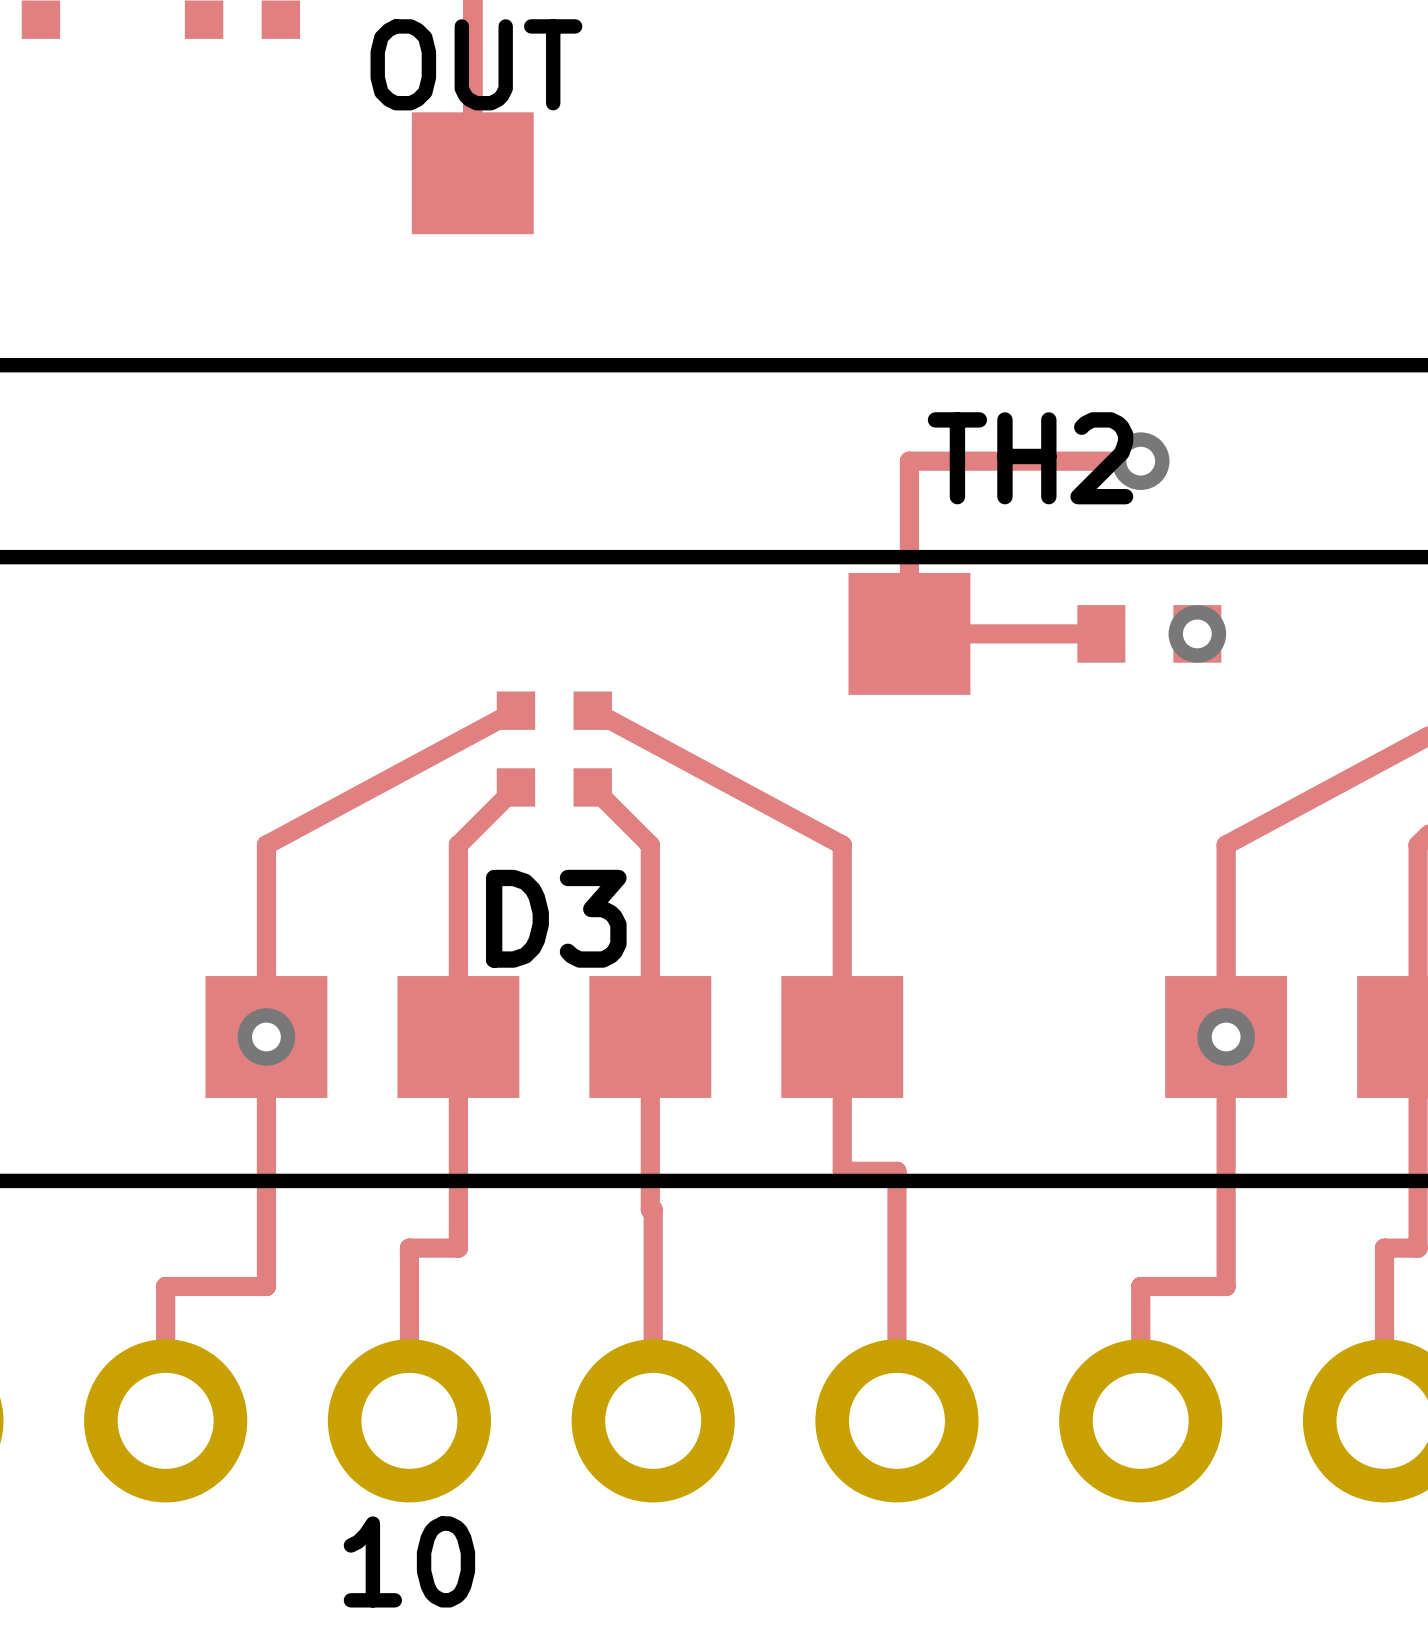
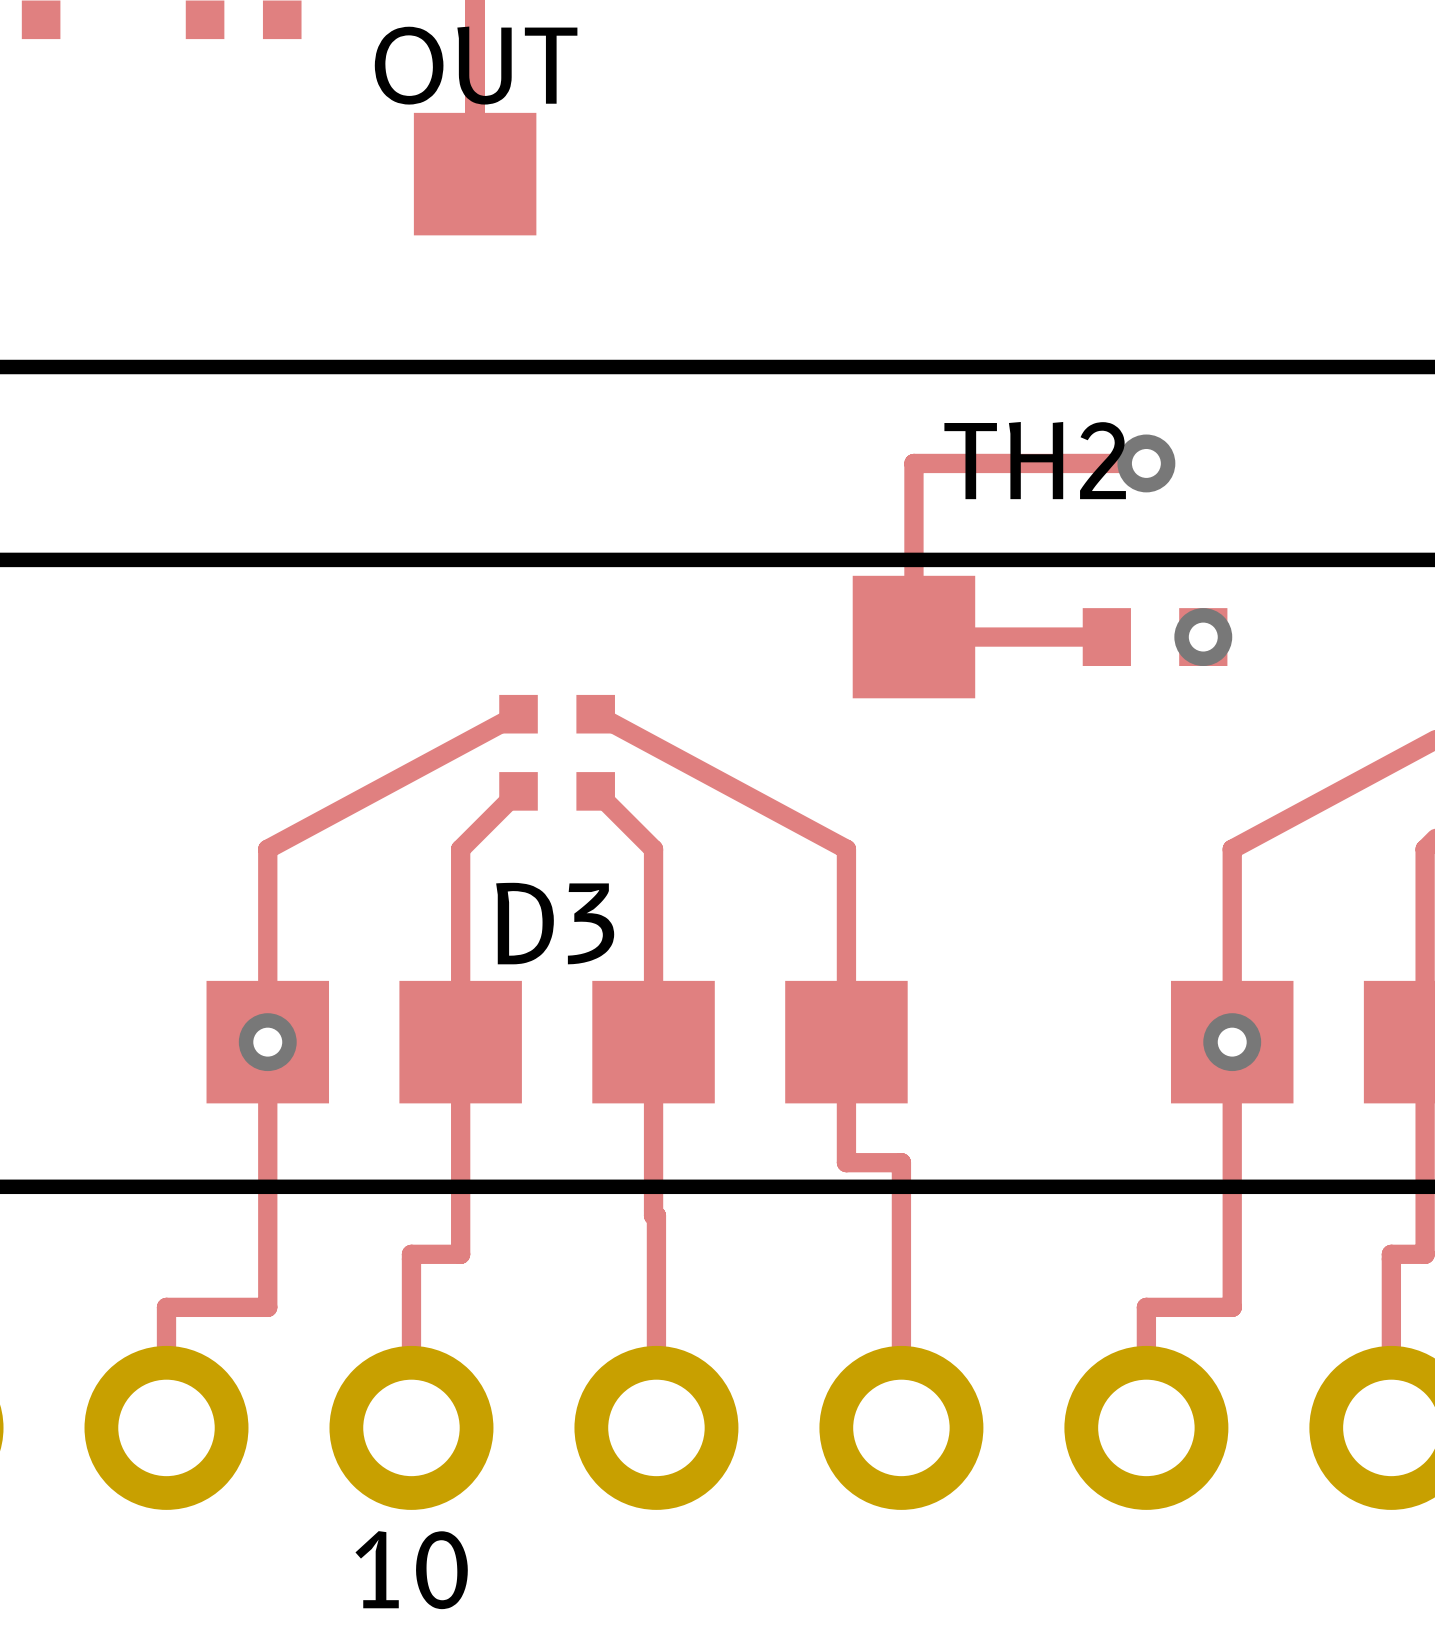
track: (842, 1156) (842, 1171) (896, 1171) -> (846, 1162) (901, 1162) (901, 1177)
track: (266, 1286) (165, 1286) (165, 1300) -> (267, 1292) (267, 1307) (166, 1307)
track: (1226, 1286) (1140, 1286) (1140, 1300) -> (1232, 1292) (1232, 1307) (1146, 1307)

